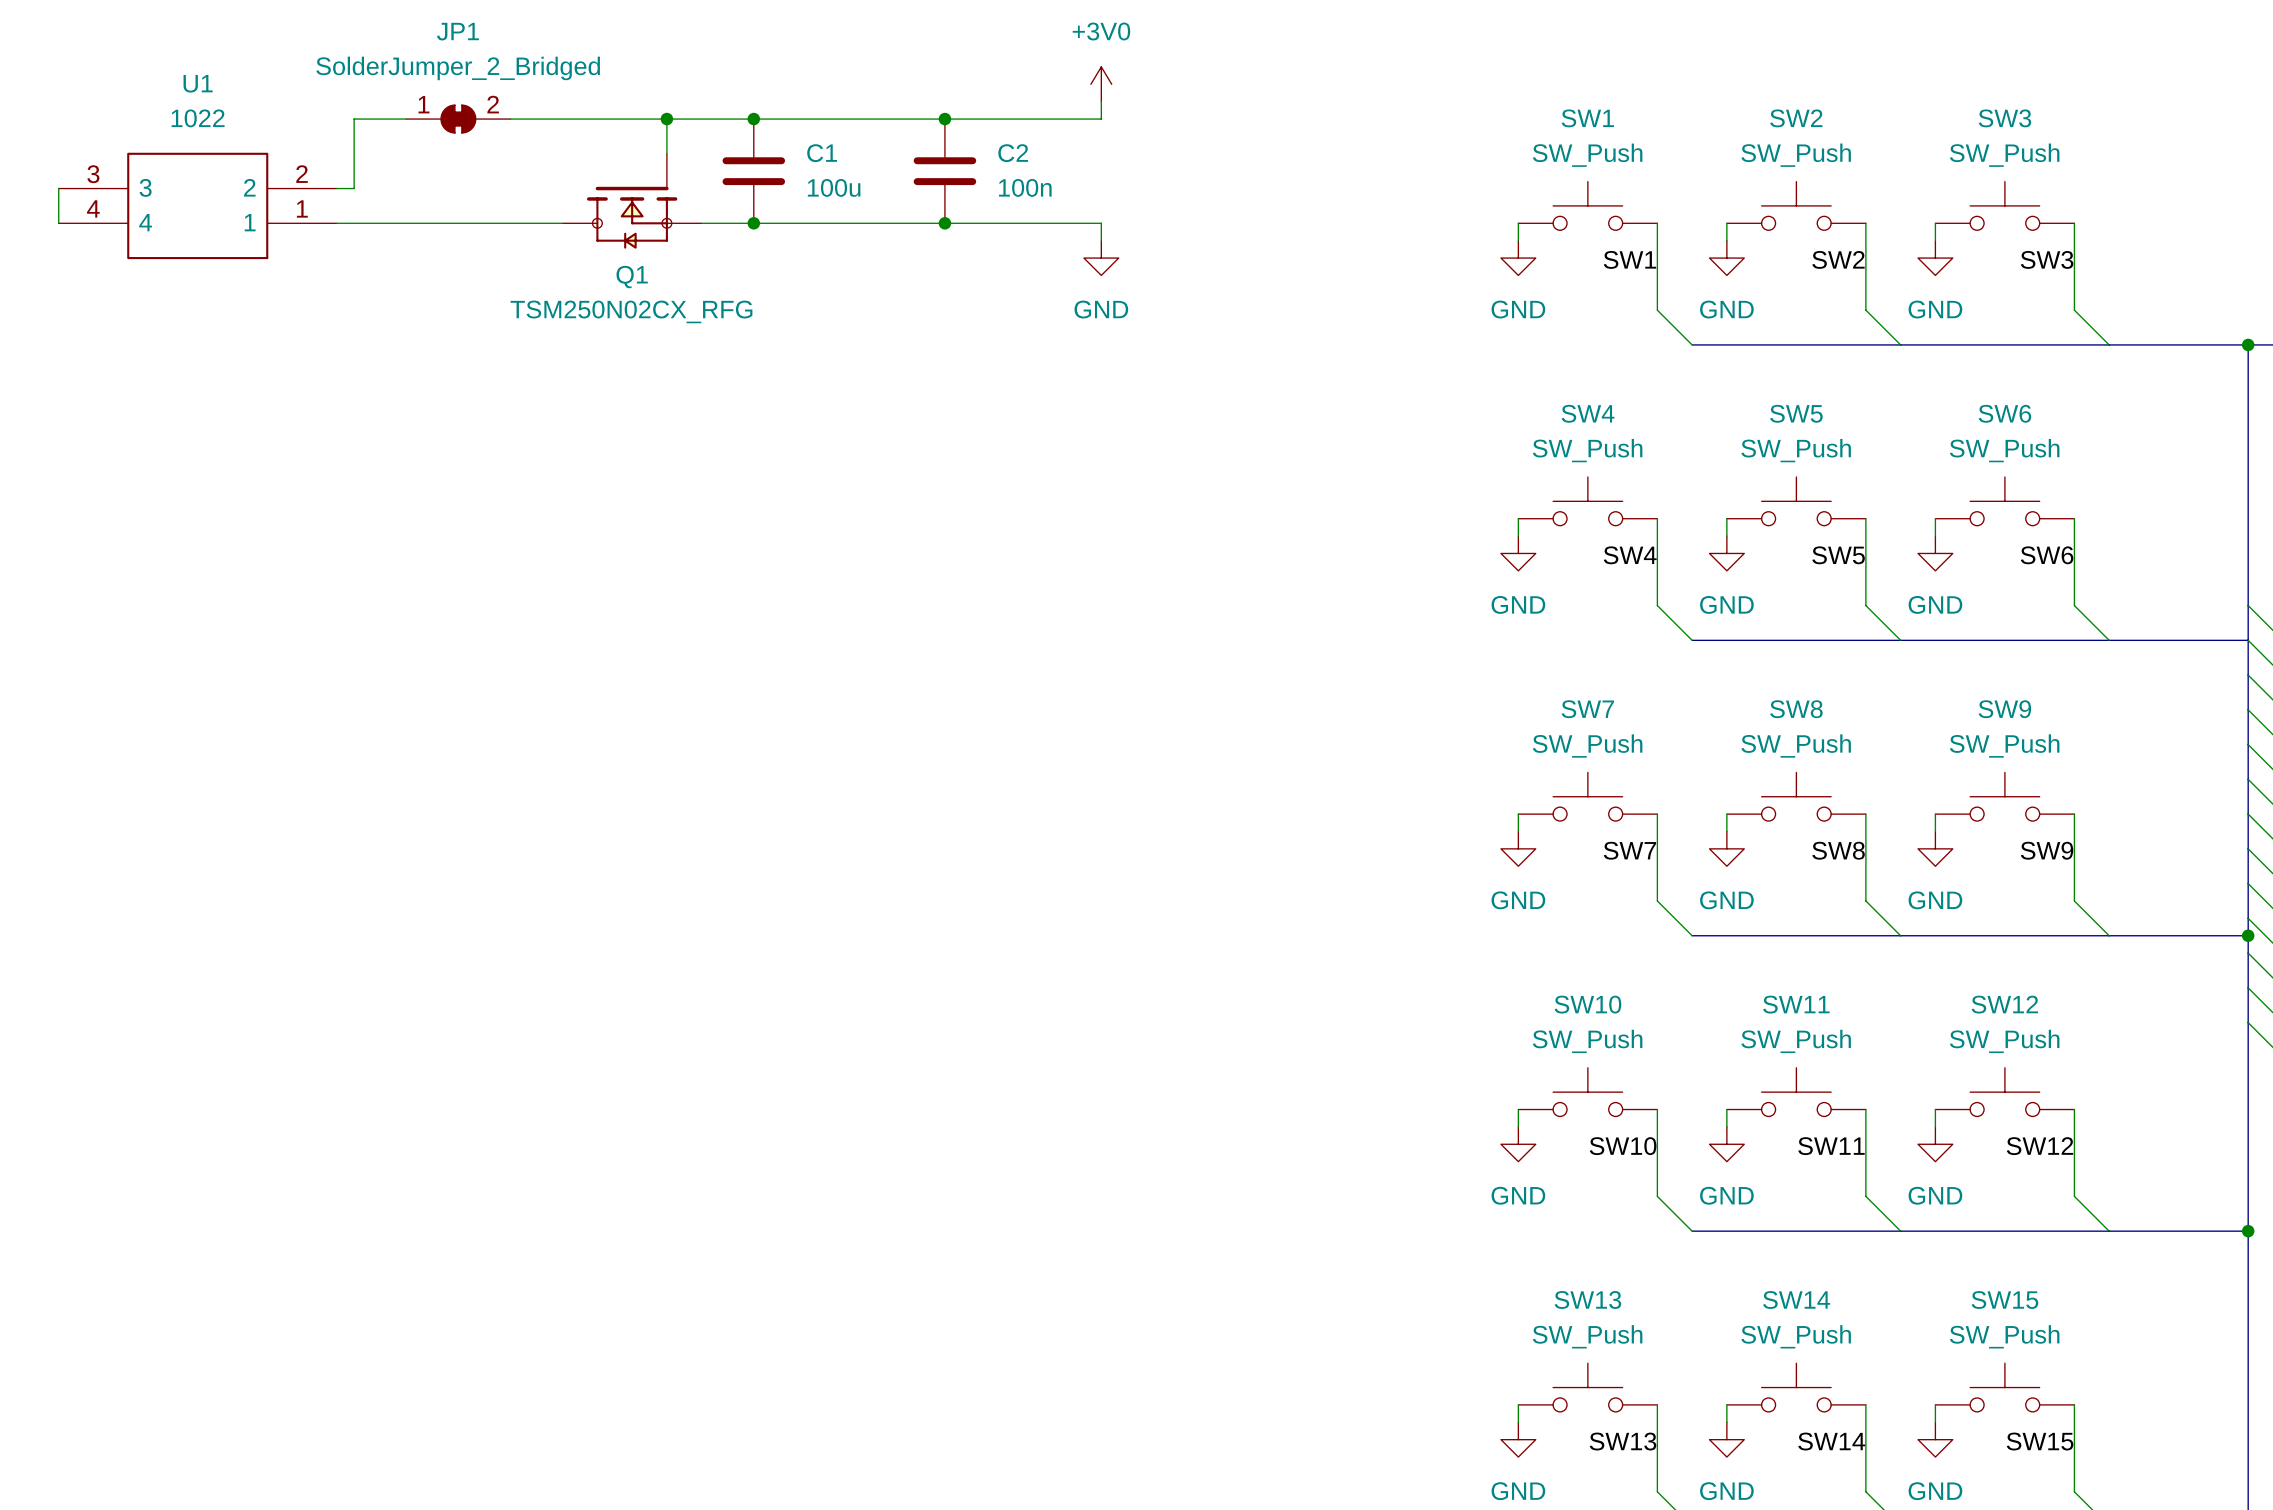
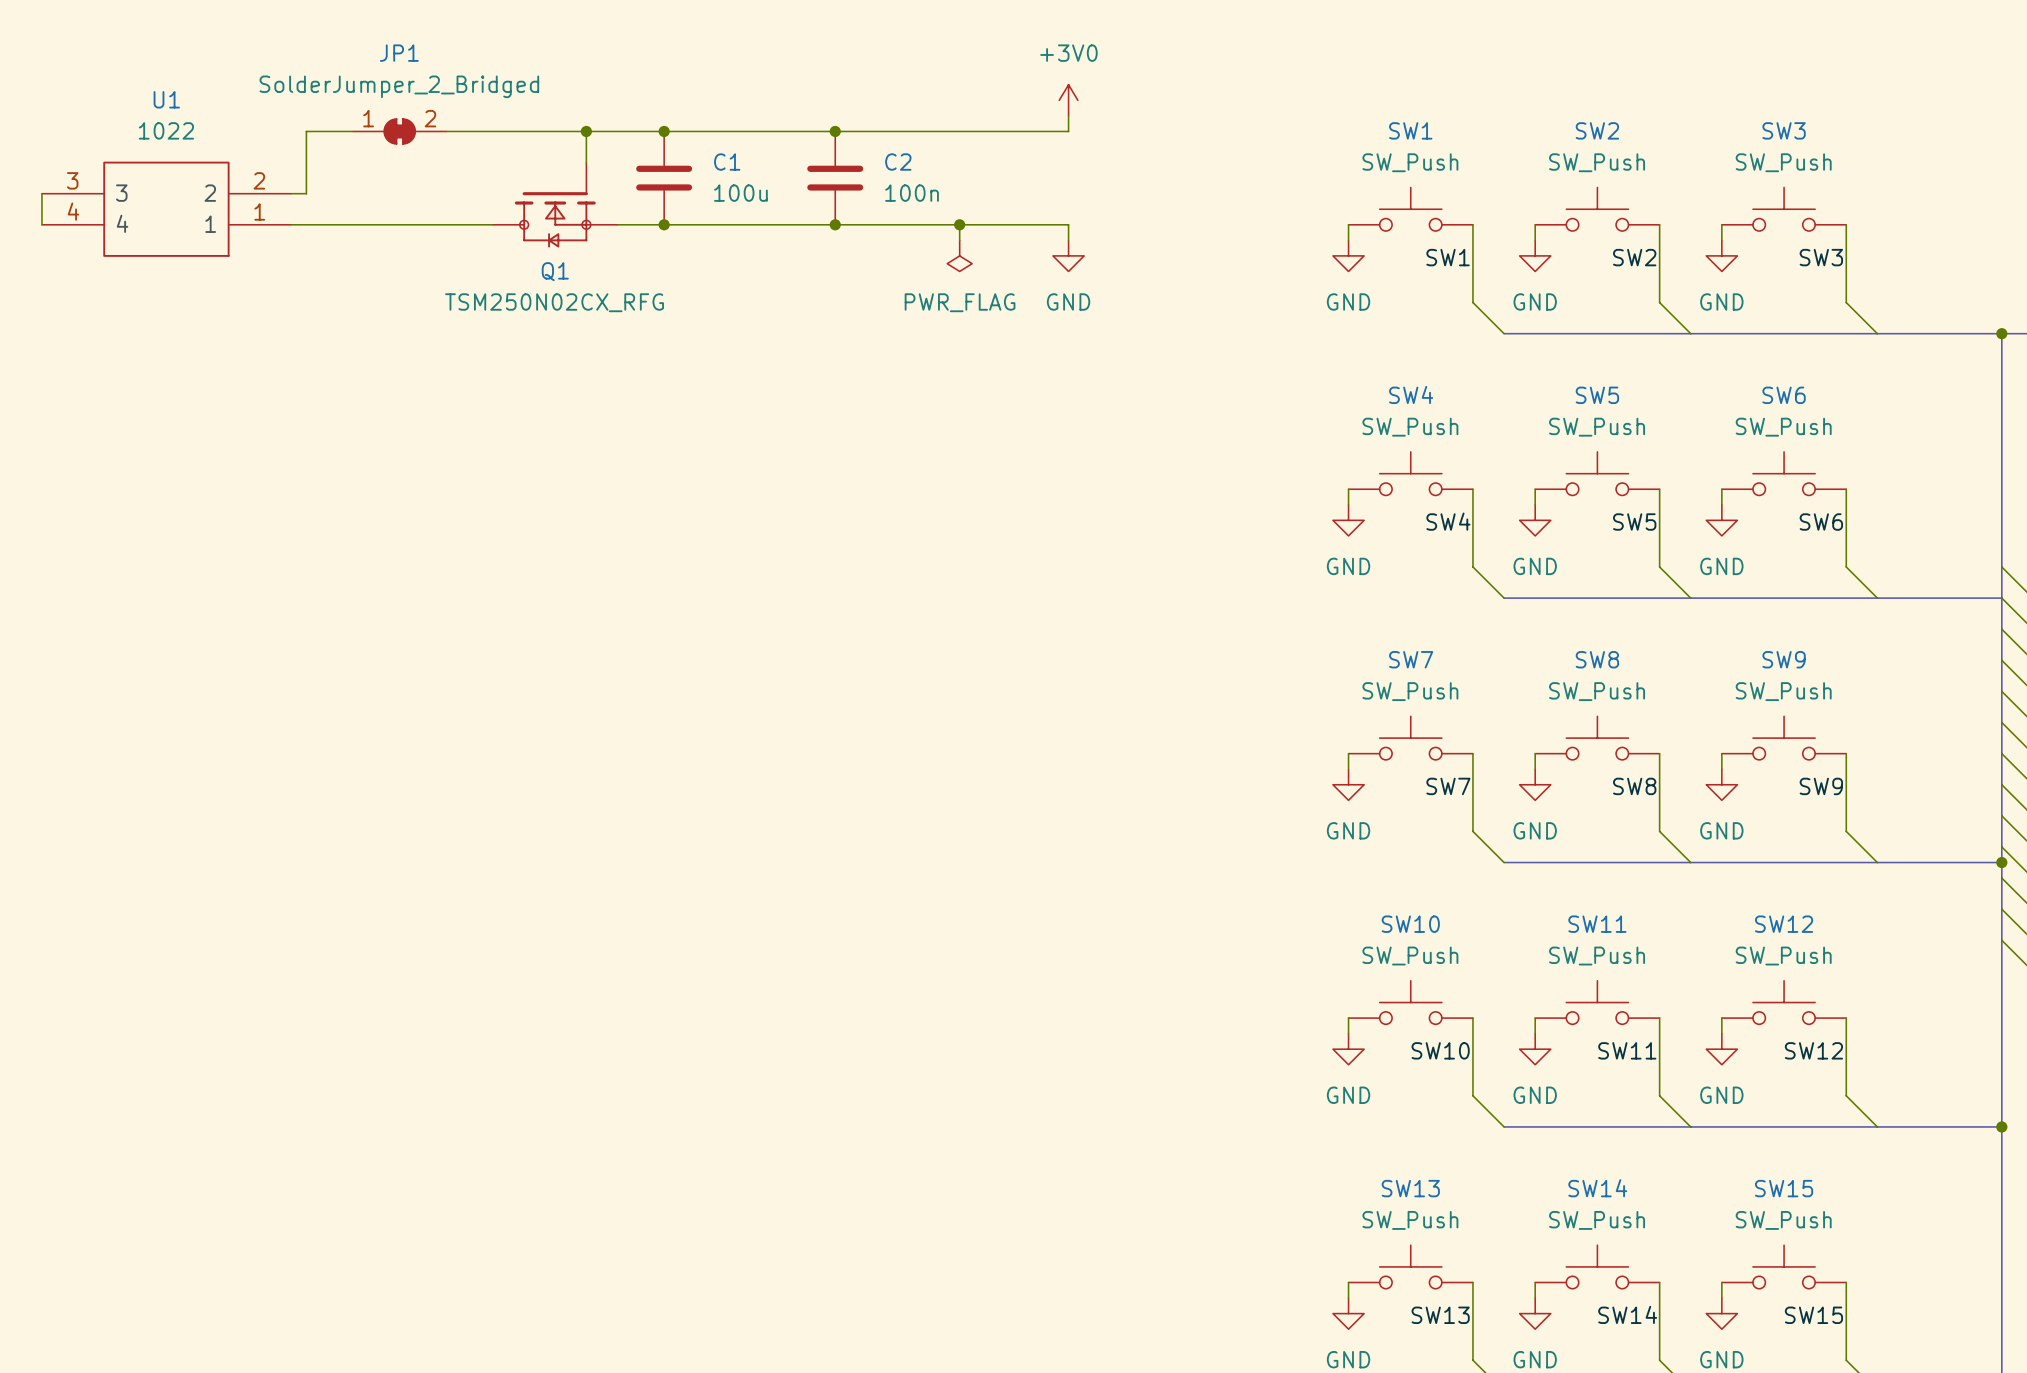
power symbol position: +3V0 (1101, 84) -> +3V0 (1068, 100)
wire: (1101, 101) (1101, 119) -> (1068, 115) (1068, 131) (975, 131)
wire: none -> (959, 224) (959, 240)
junction: none -> (959, 224)
wire: (1101, 223) (1101, 240) -> (975, 224) (1068, 224) (1068, 240)
power symbol: none -> PWR_FLAG (959, 255)
power symbol position: GND (1101, 258) -> GND (1068, 255)

